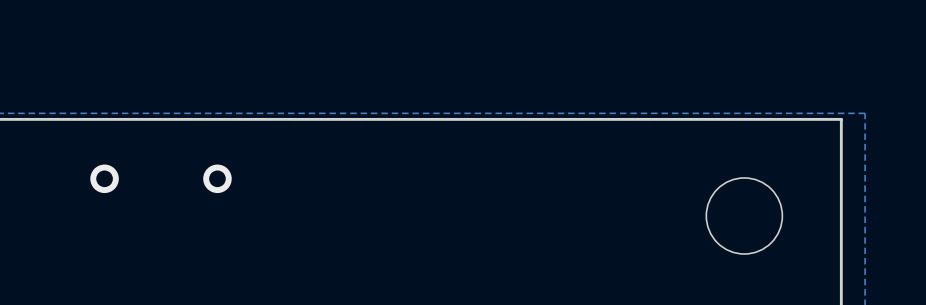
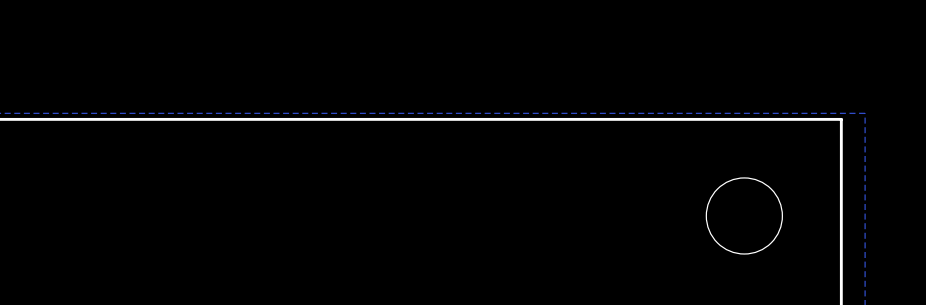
via: (104, 178) -> none
via: (217, 178) -> none

